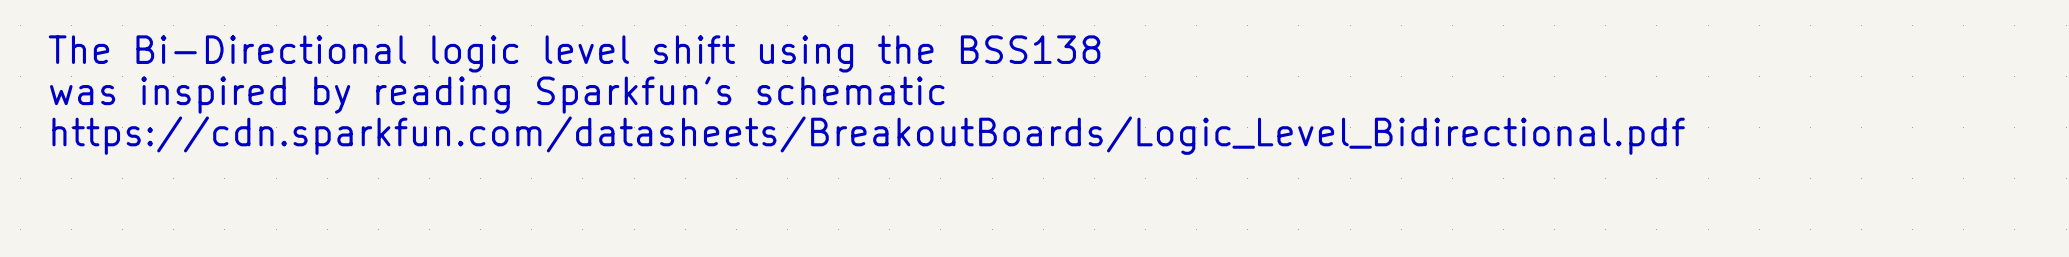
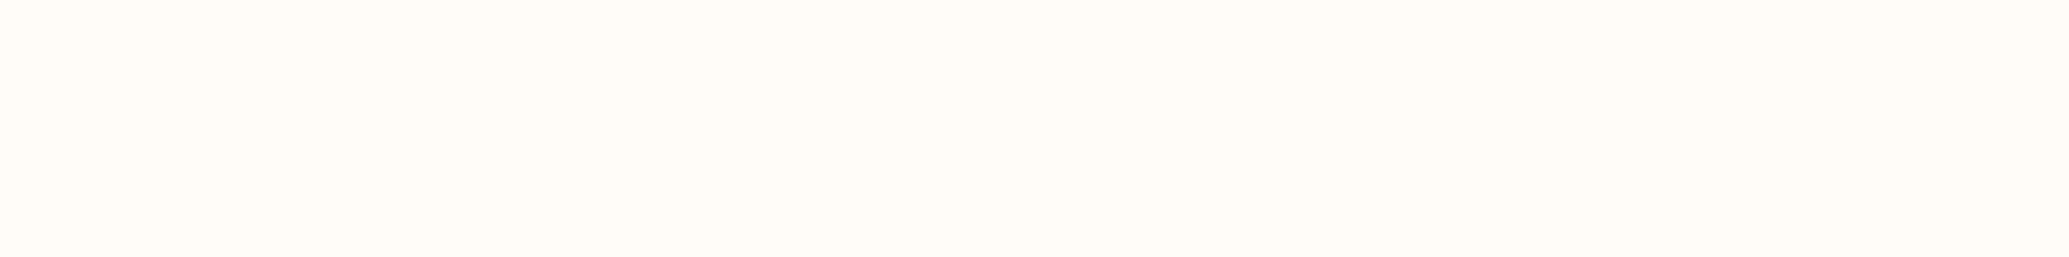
text: The Bi-Directional logic level shift using the BSS138 (574, 53) -> none
text: was inspired by reading Sparkfun's schematic (497, 95) -> none
text: https://cdn.sparkfun.com/datasheets/BreakoutBoards/Logic_Level_Bidirectional.pdf (868, 135) -> none

